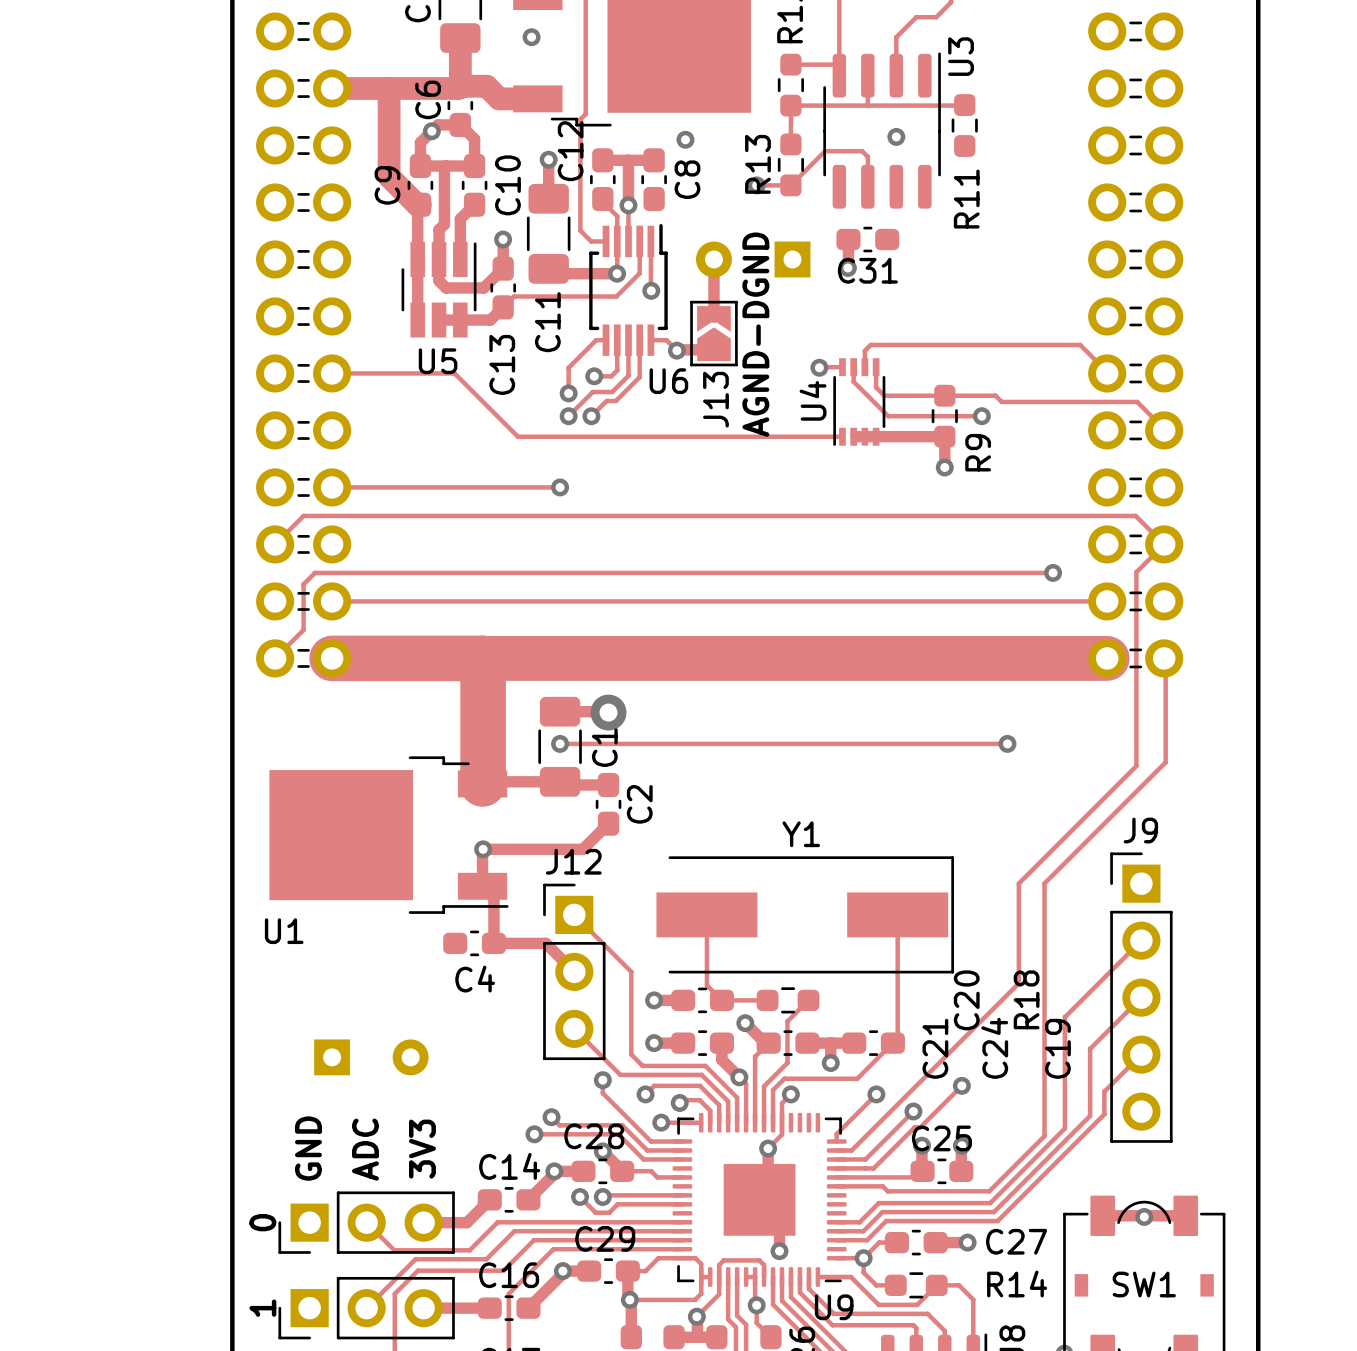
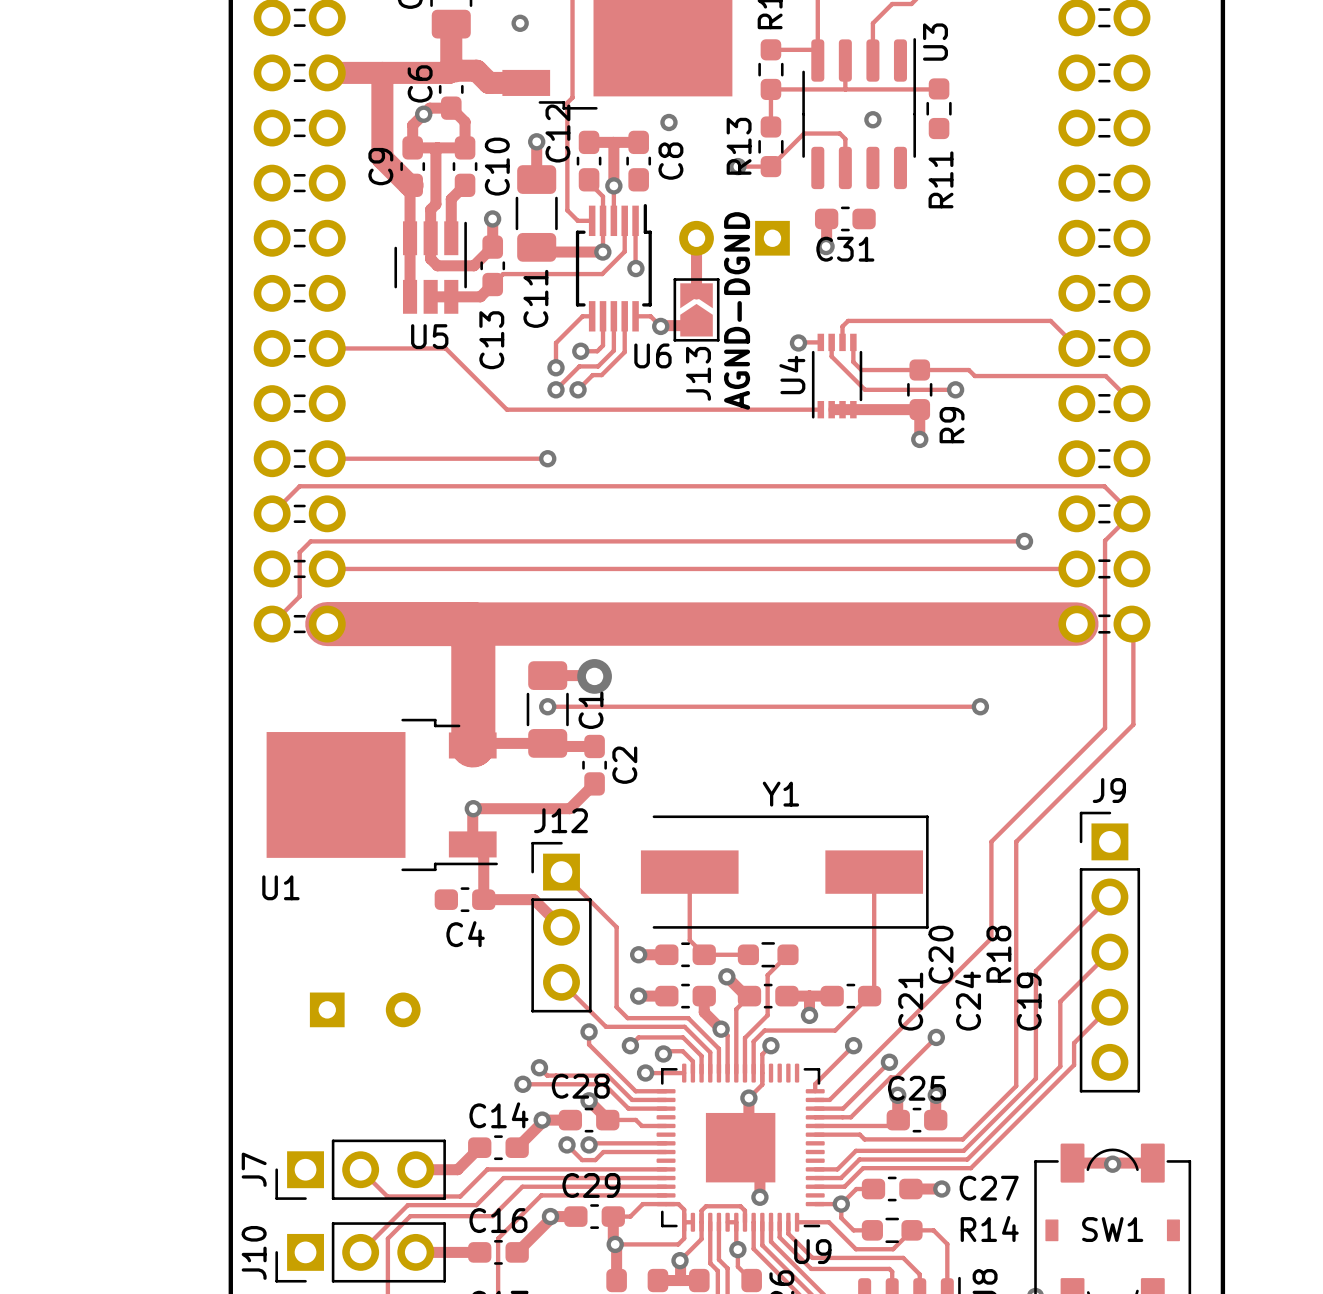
text: GND (308, 1148) -> none
text: ADC (365, 1149) -> none
text: 3V3 (422, 1149) -> none
J7 name: none -> J7 (254, 1169)
text: 0 (262, 1222) -> none
J10 name: none -> J10 (254, 1252)
text: 1 (262, 1308) -> none

